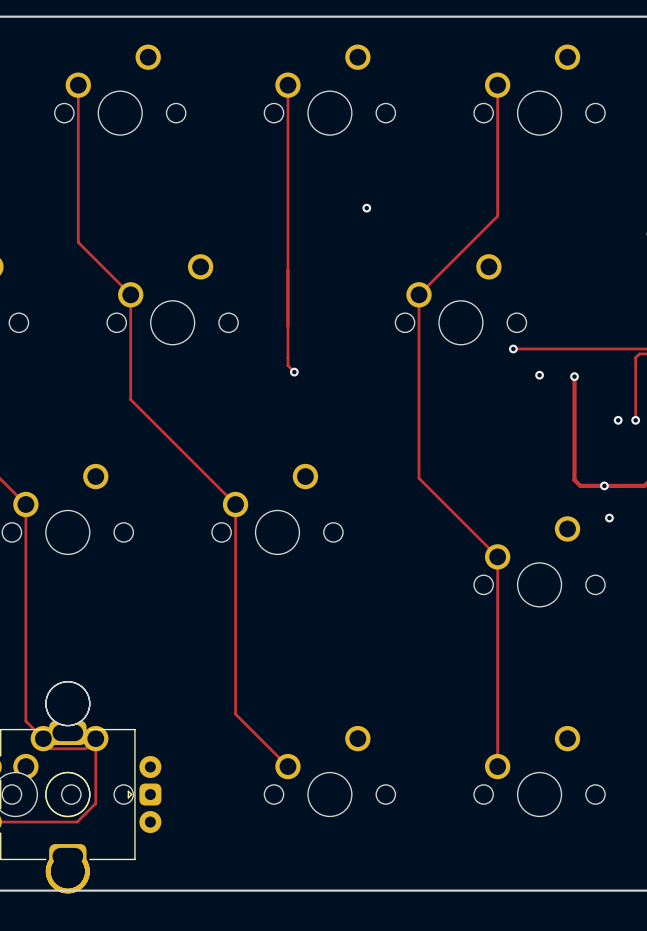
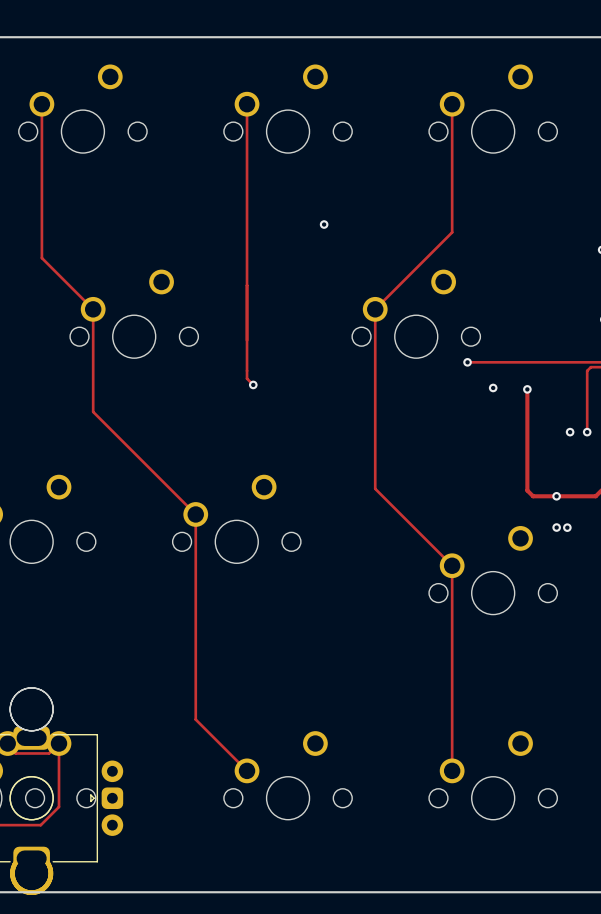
via: none -> (556, 527)
via: none -> (567, 527)
via: (609, 518) -> none

